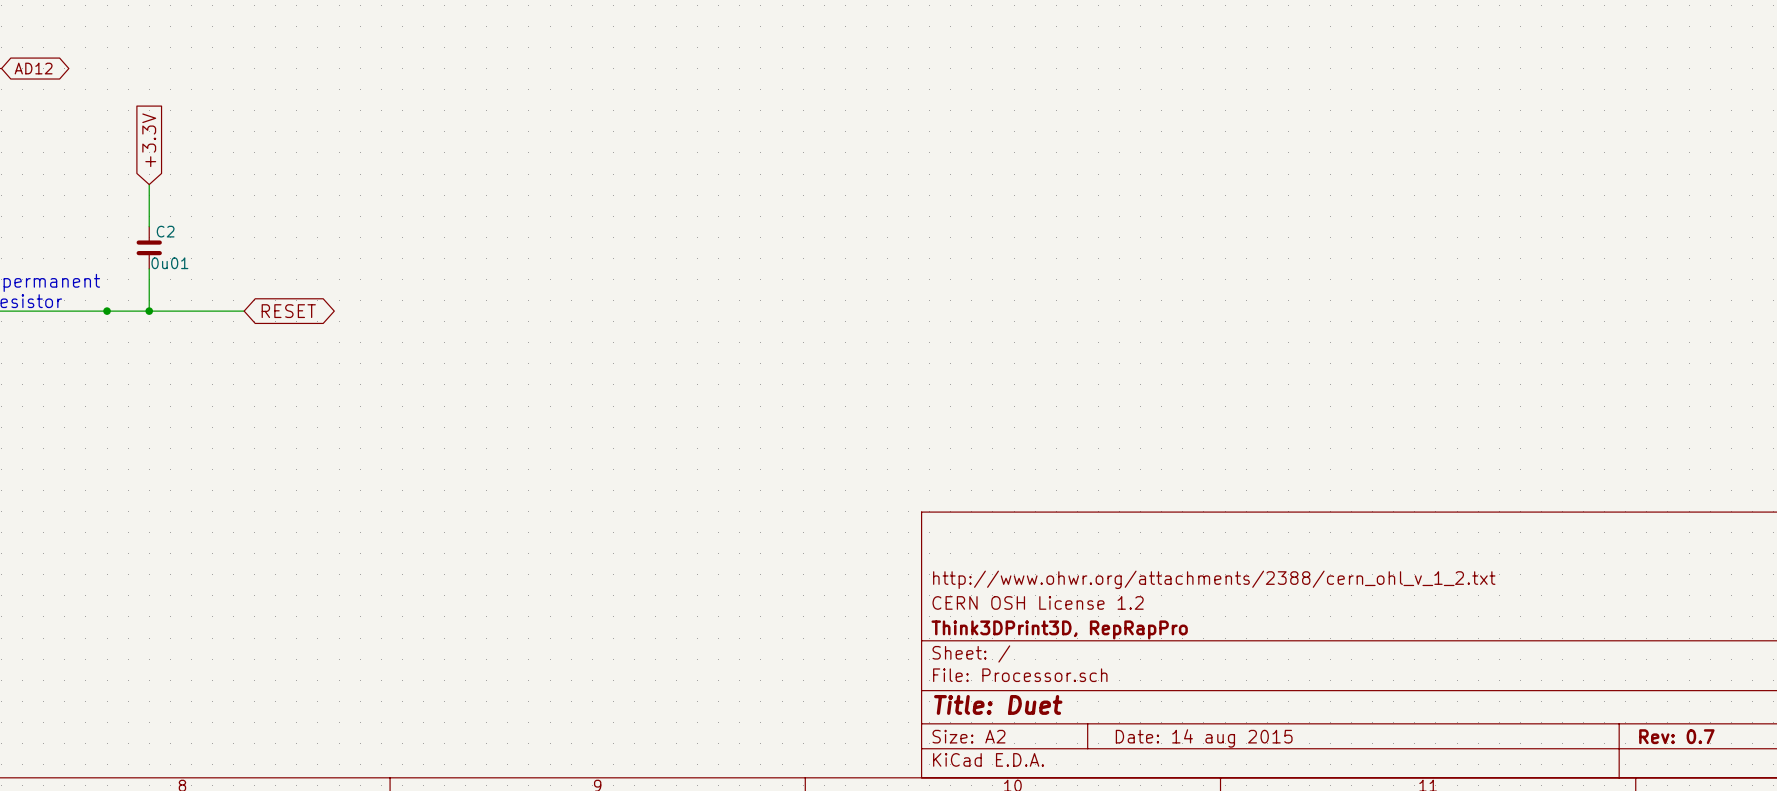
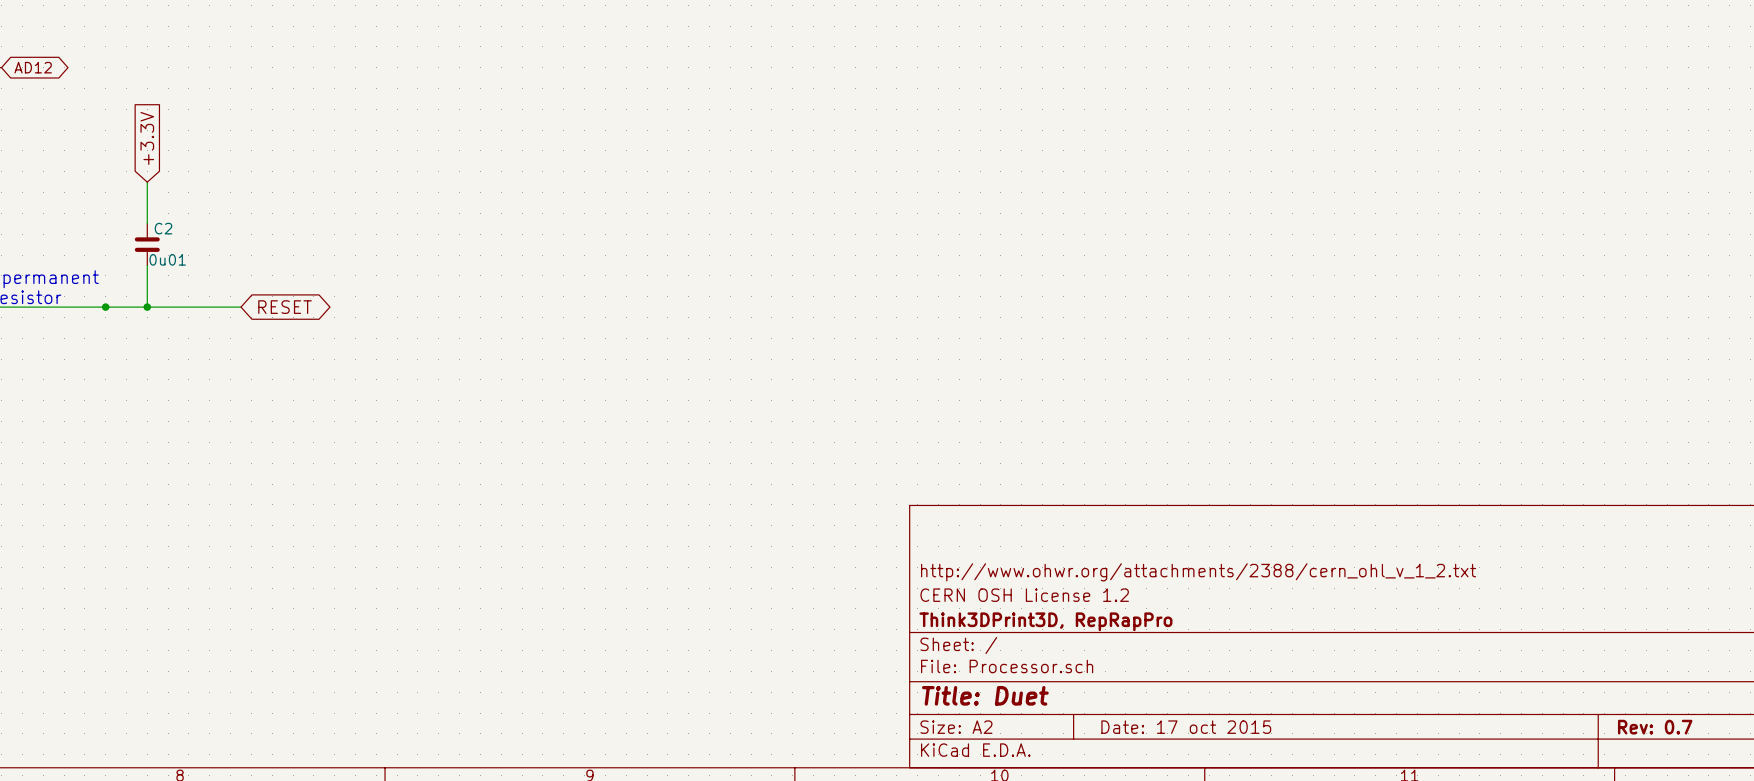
title block: Date: 14 aug 2015 (1204, 738) -> Date: 17 oct 2015 (1186, 727)

